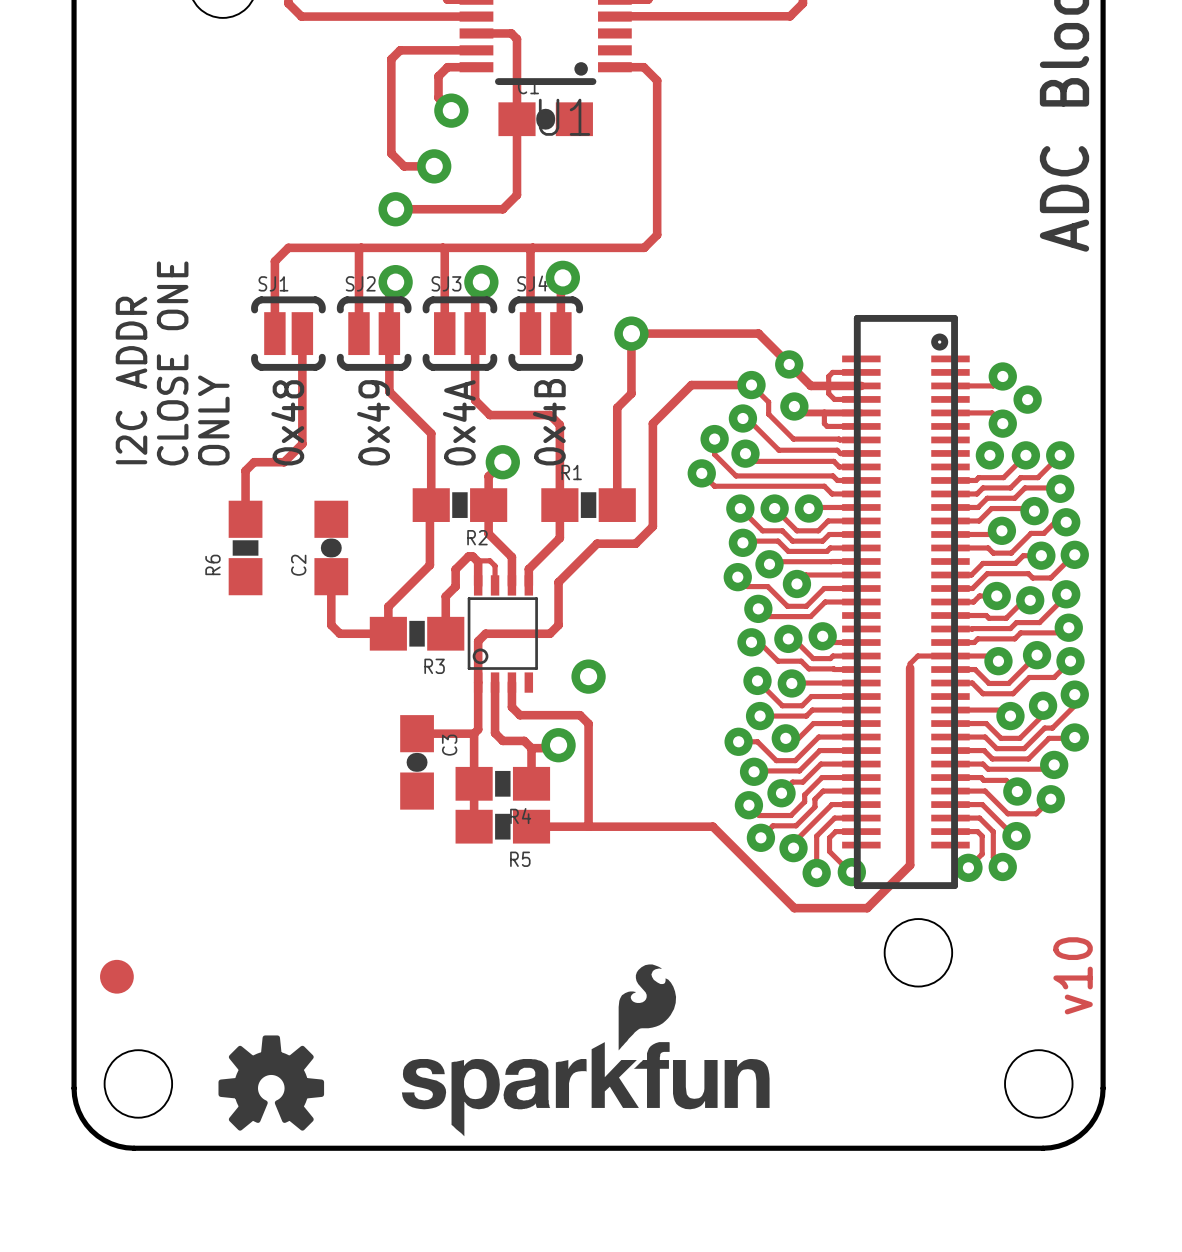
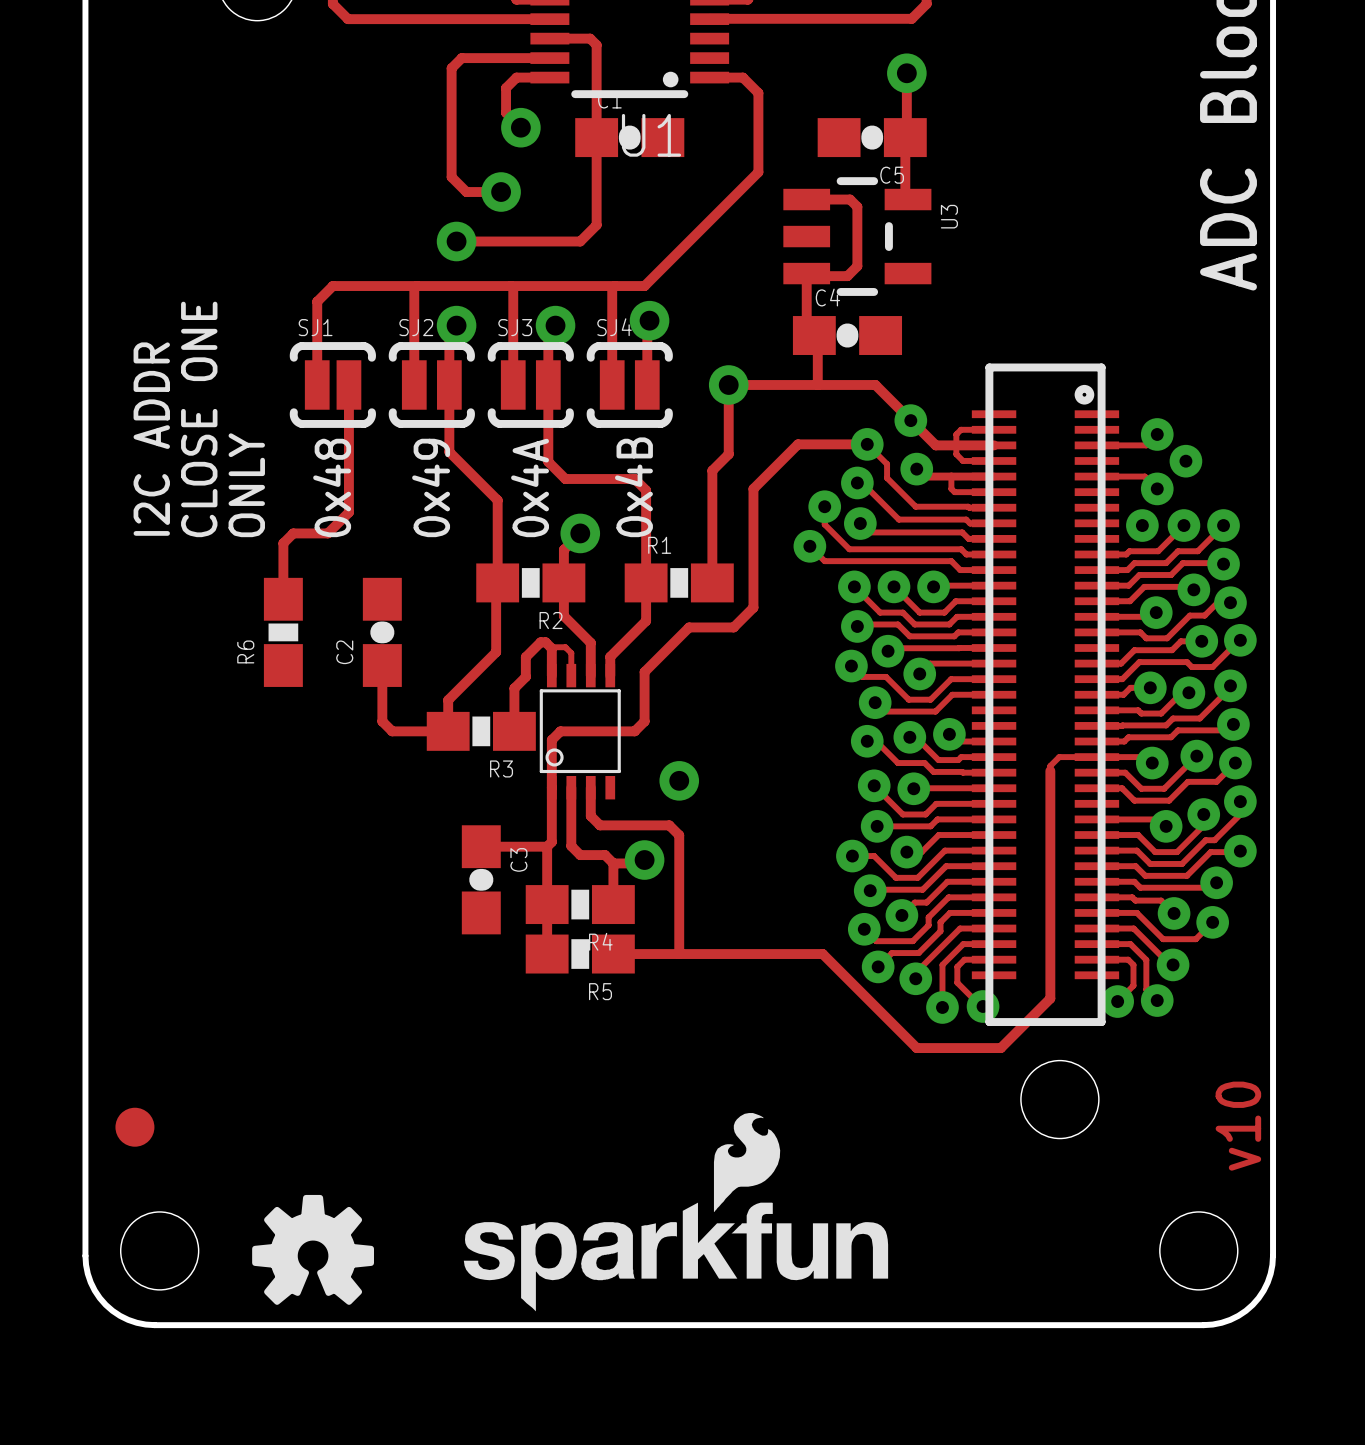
track: none -> (906, 73) (905, 196) (908, 199)
via: none -> (906, 73)
C5: none -> (872, 137)
track: (657, 149) (657, 234) (644, 247) (558, 247) -> (758, 172) (644, 286)
track: none -> (806, 199) (850, 199) (857, 206) (857, 266) (847, 276) (806, 276)
U3: none -> (857, 236)
track: none -> (806, 273) (806, 327) (817, 338) (817, 384)
C4: none -> (847, 335)

